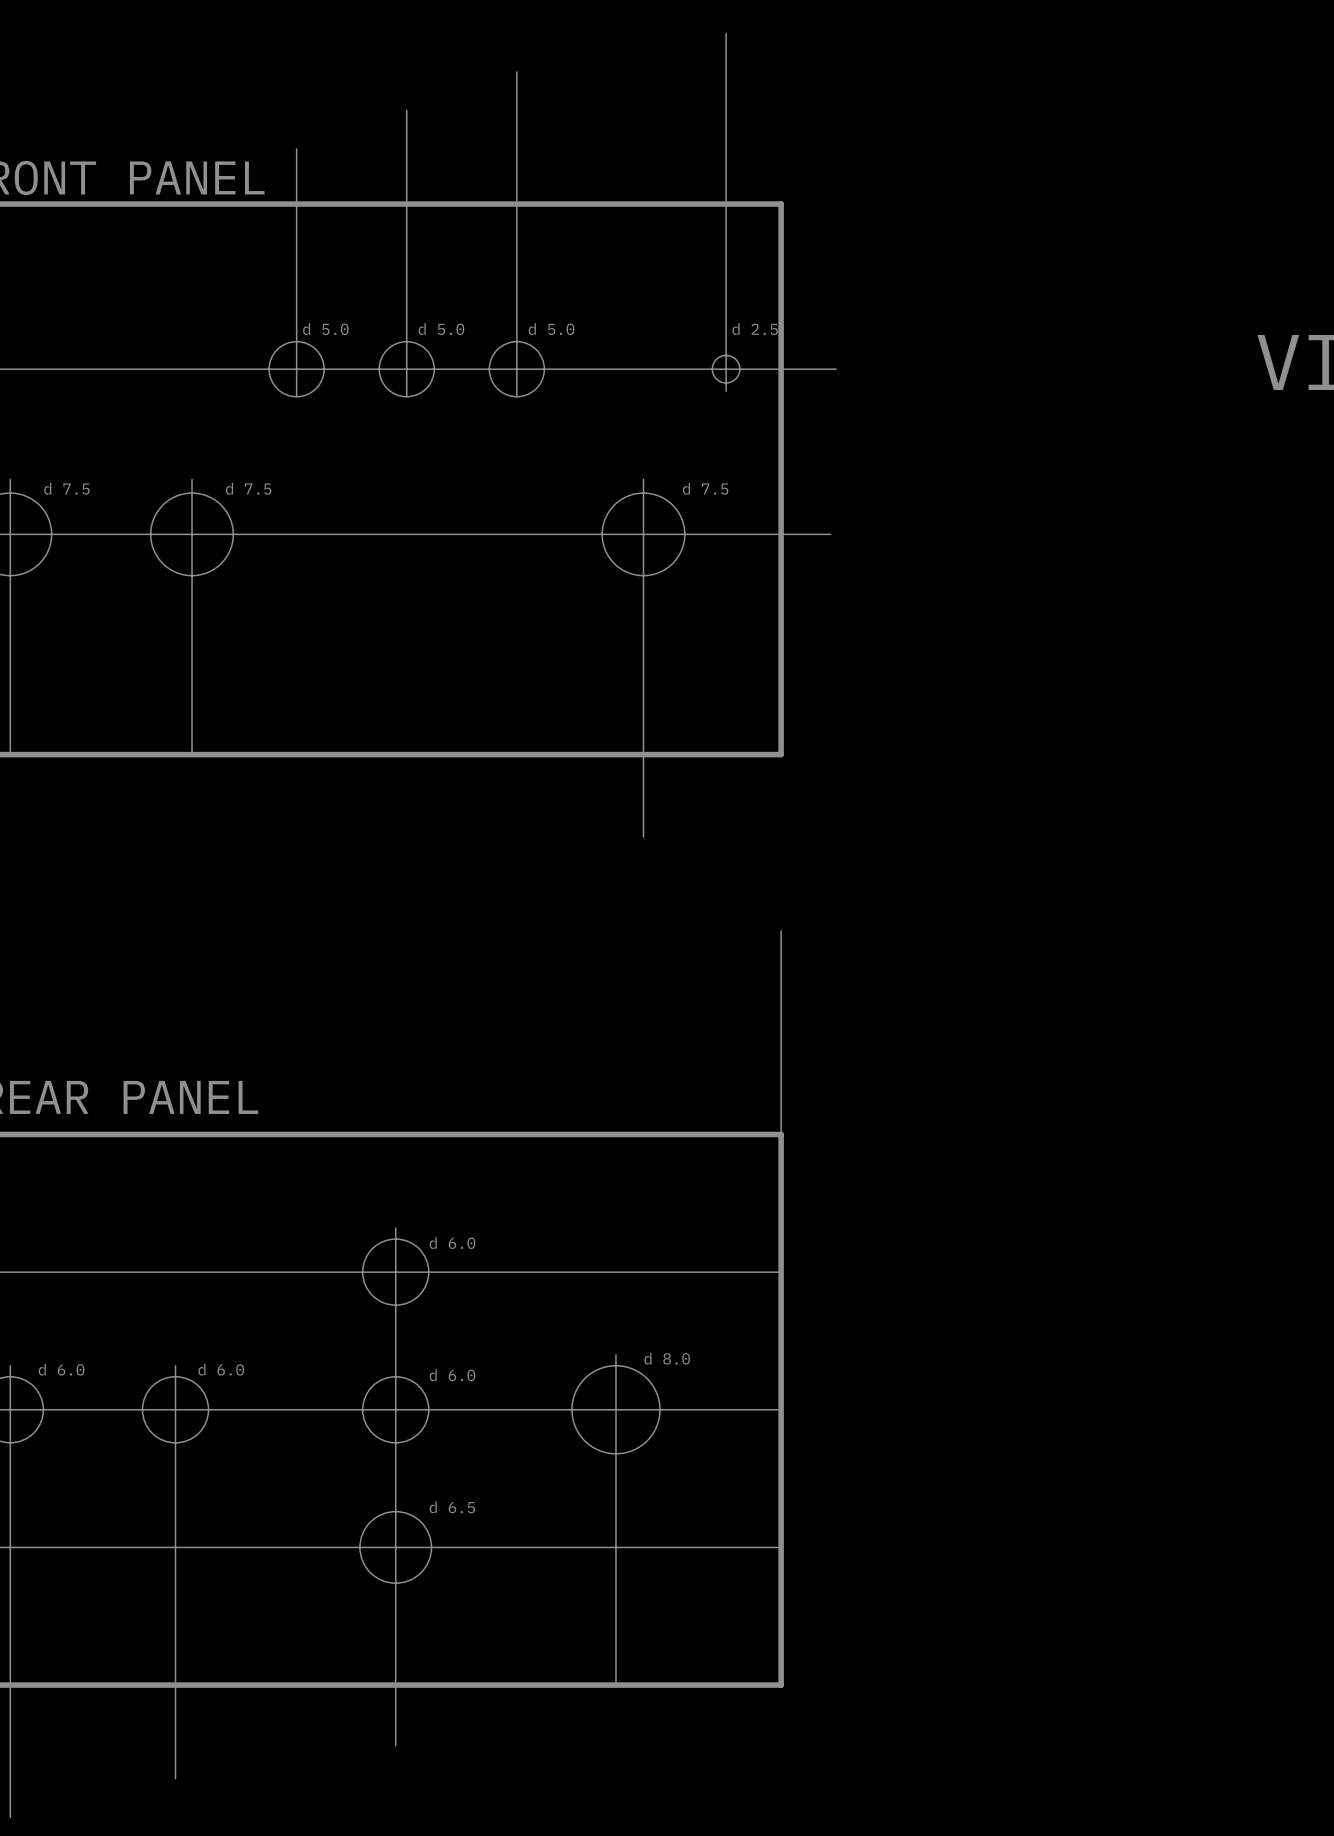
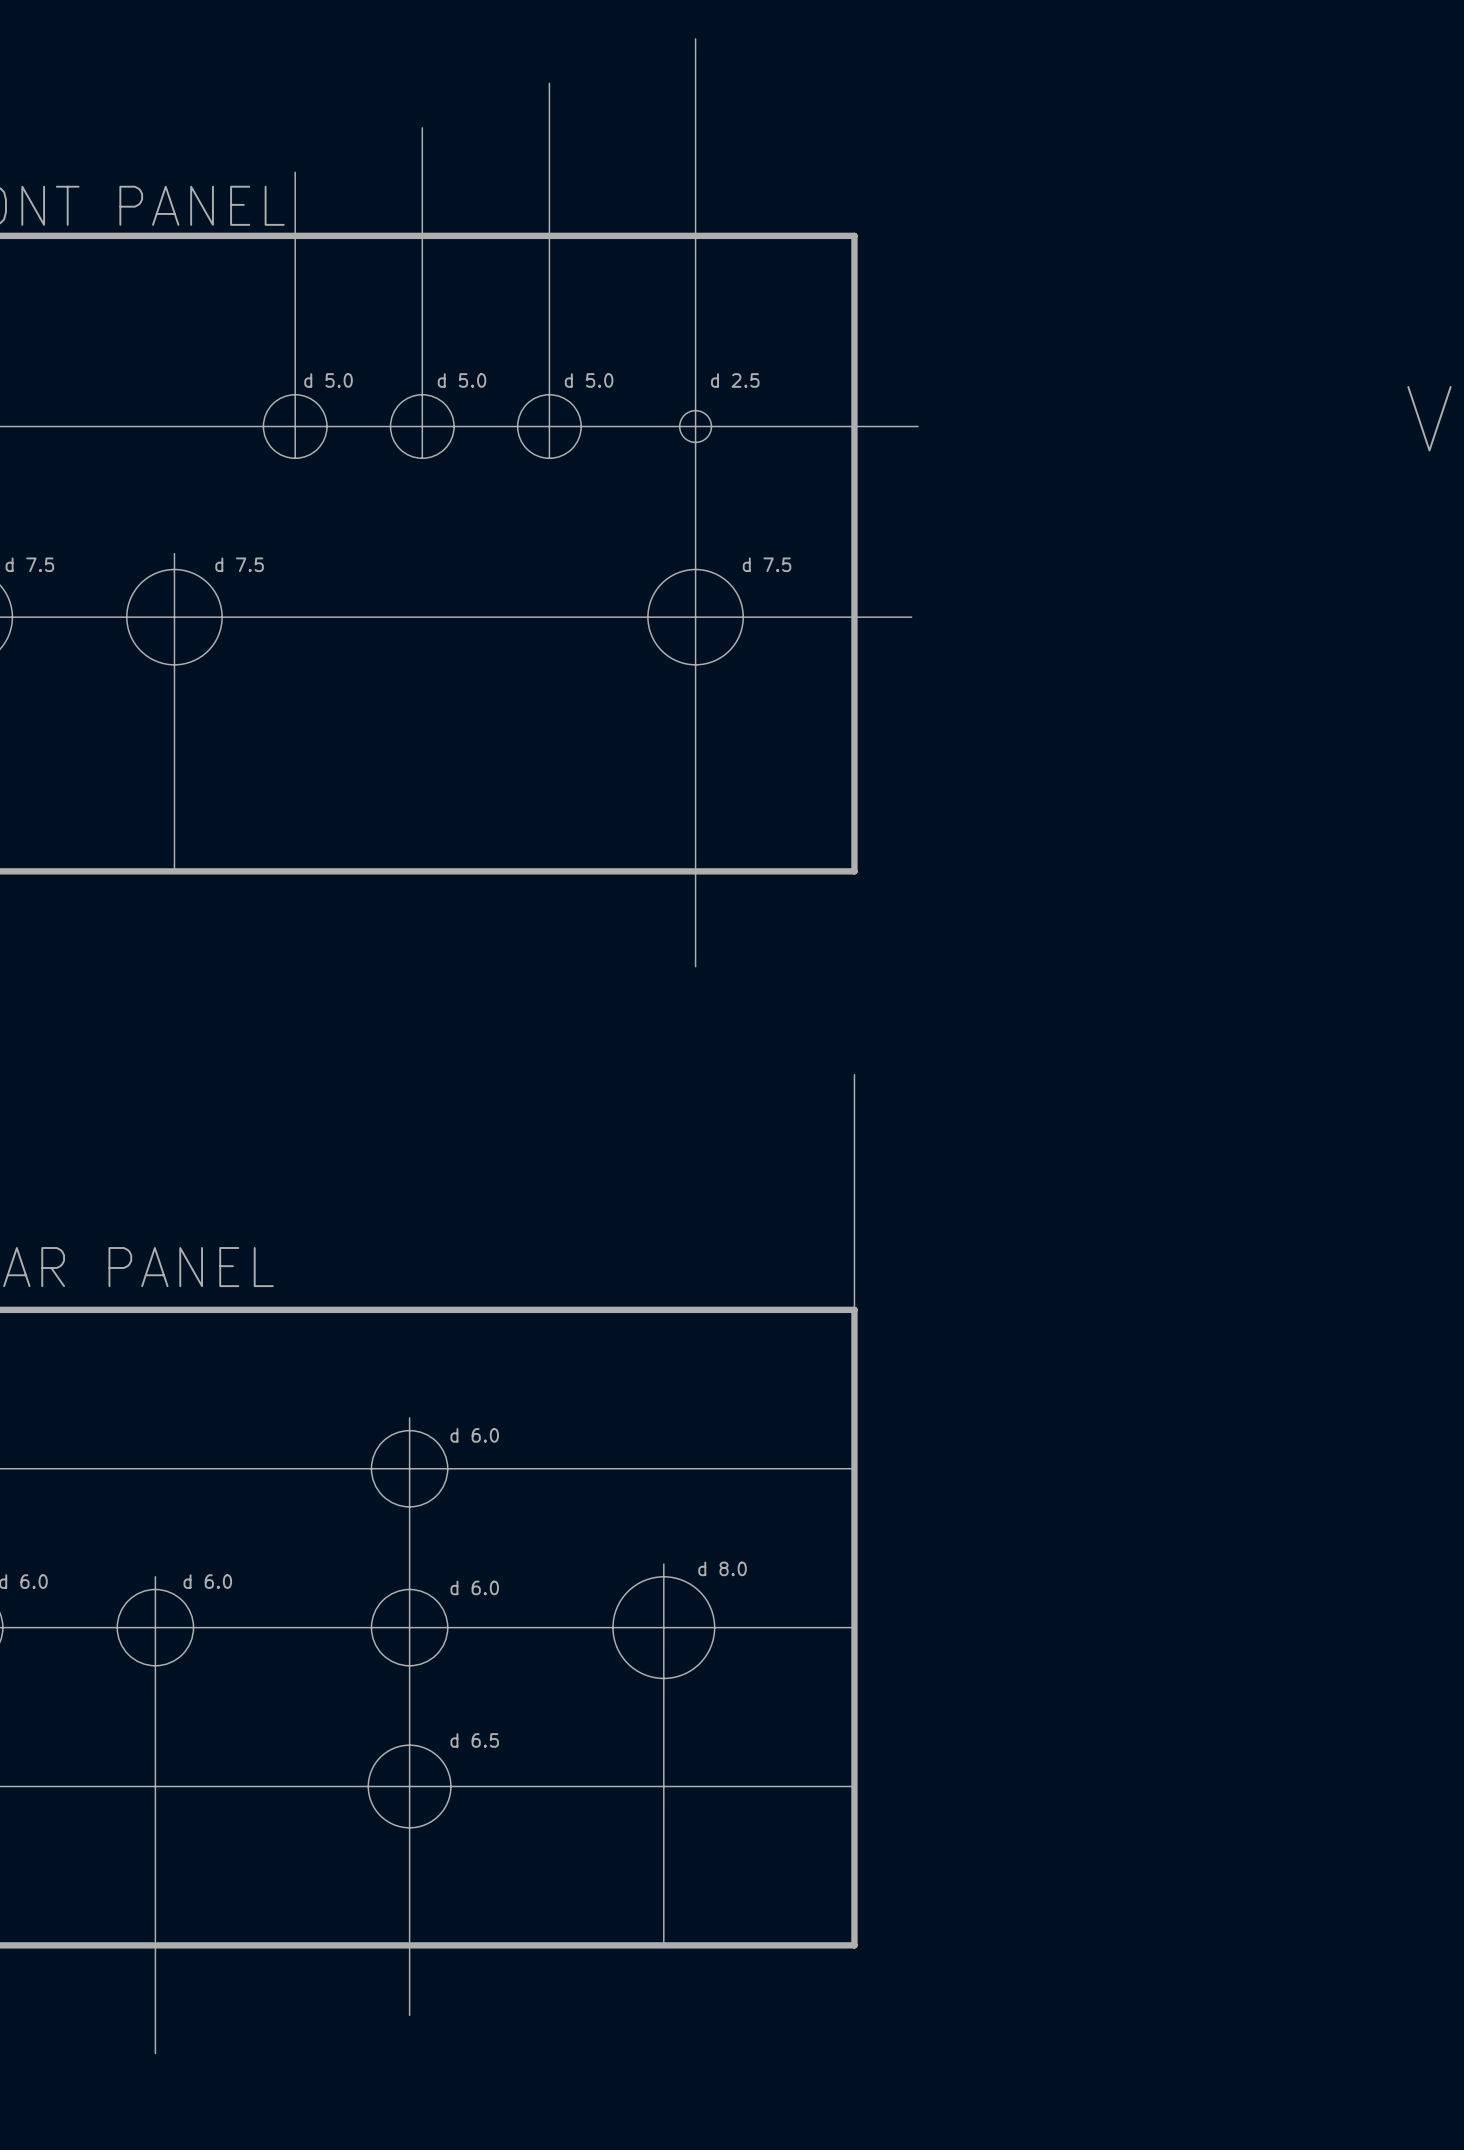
line: none -> (695, 38) (695, 553)
line: (726, 33) (726, 391) -> none
text position: d 2.5 (755, 329) -> d 2.5 (735, 380)
drawing position: (726, 369) -> (695, 426)

